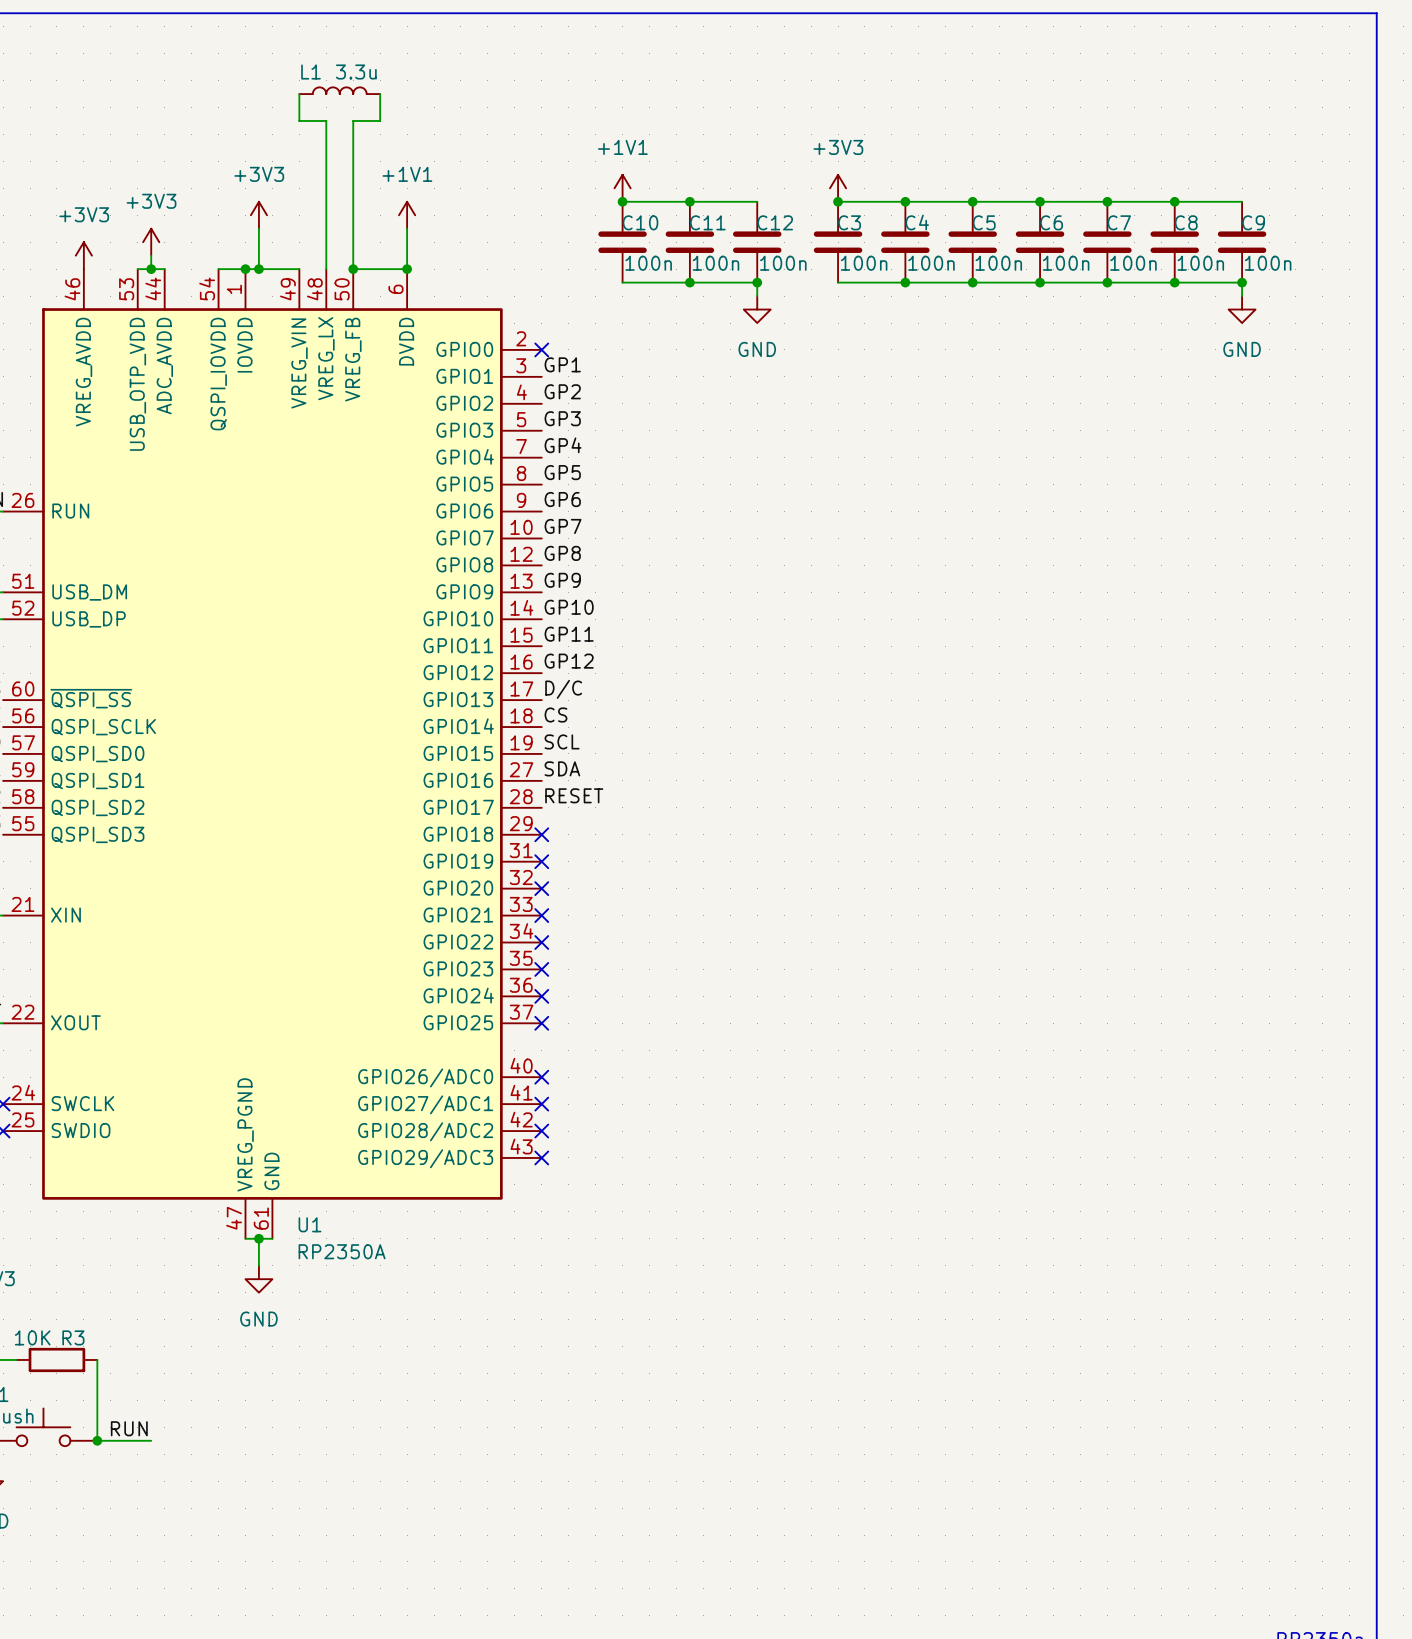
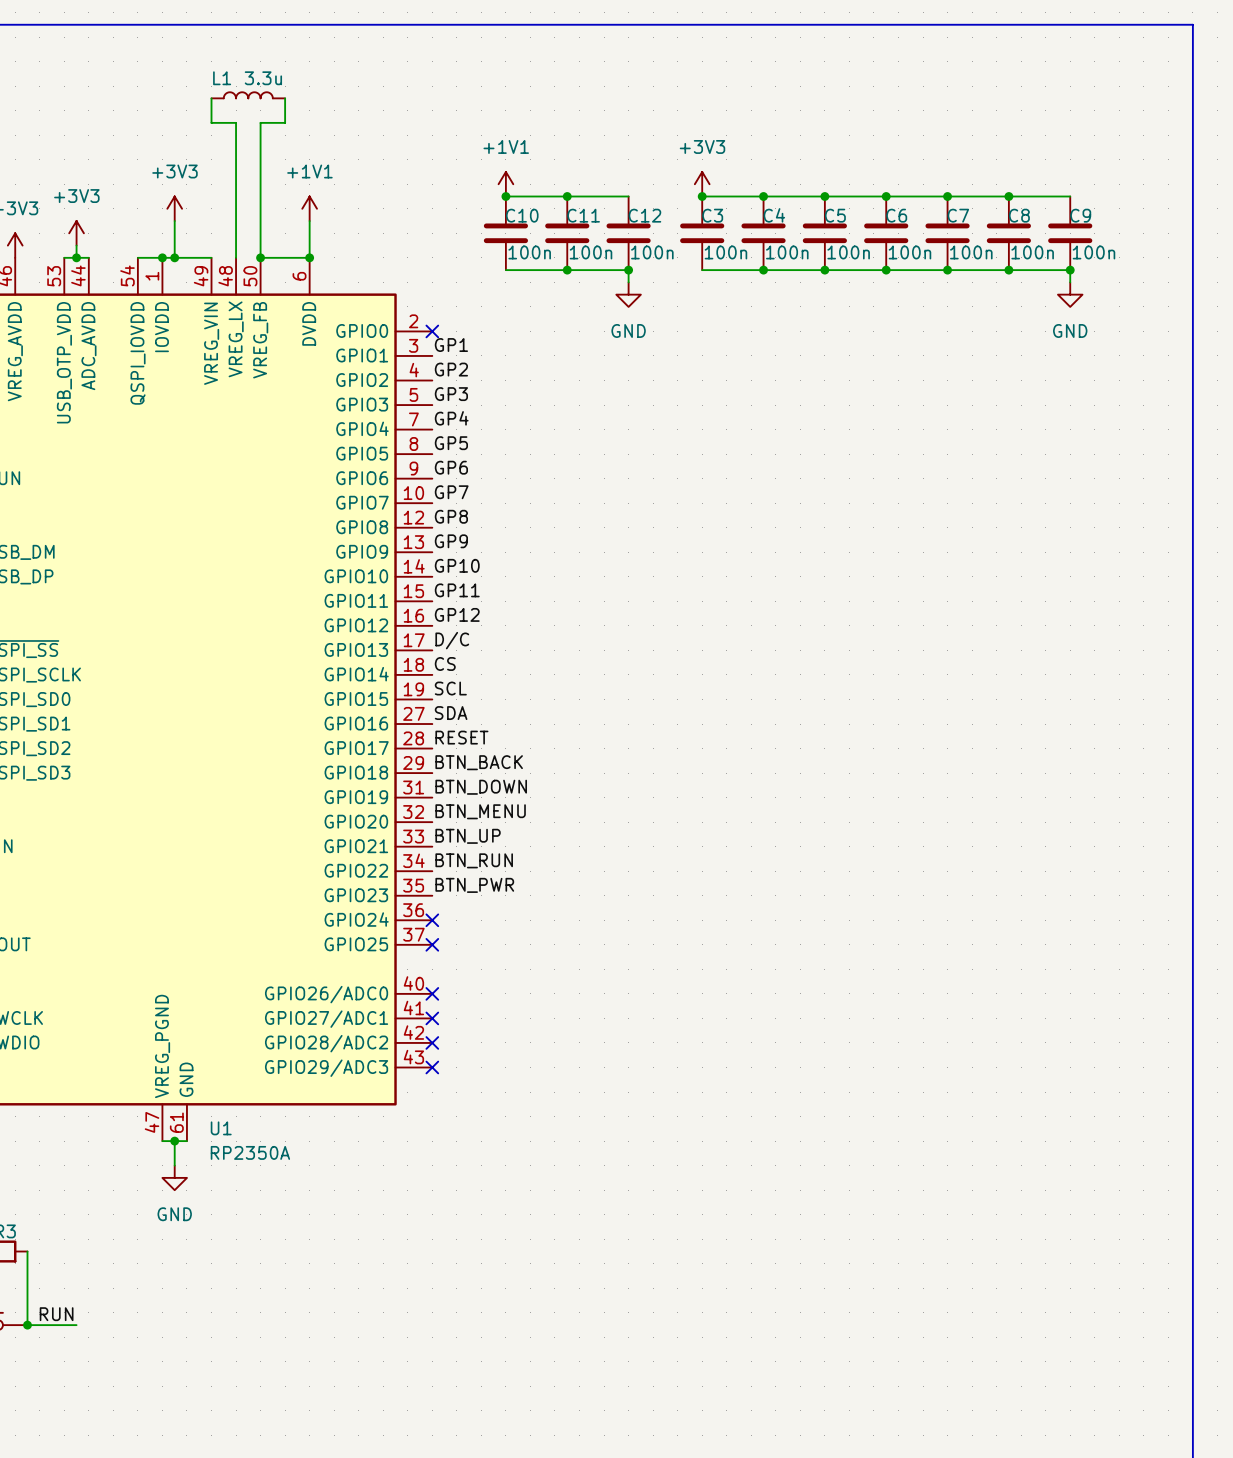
label: none -> BTN_BACK (479, 762)
no-connect mark: (541, 834) -> none
label: none -> BTN_DOWN (481, 787)
no-connect mark: (541, 861) -> none
label: none -> BTN_MENU (480, 811)
no-connect mark: (541, 888) -> none
label: none -> BTN_UP (468, 836)
no-connect mark: (541, 915) -> none
label: none -> BTN_RUN (474, 860)
no-connect mark: (541, 942) -> none
label: none -> BTN_PWR (474, 885)
no-connect mark: (541, 969) -> none

